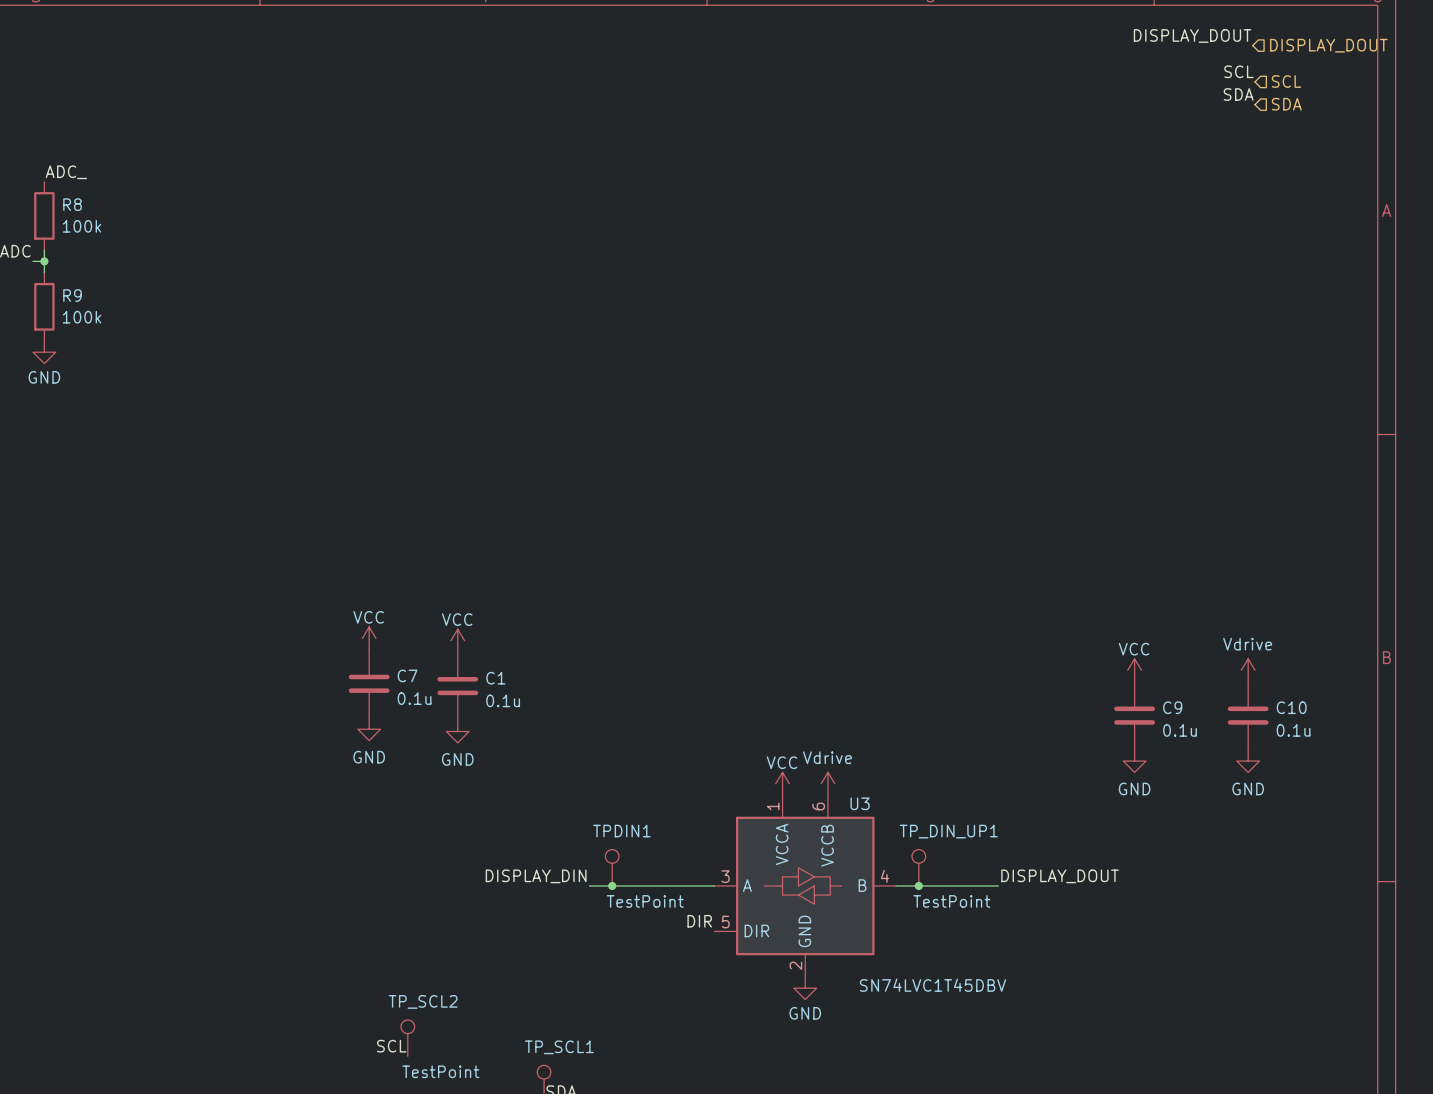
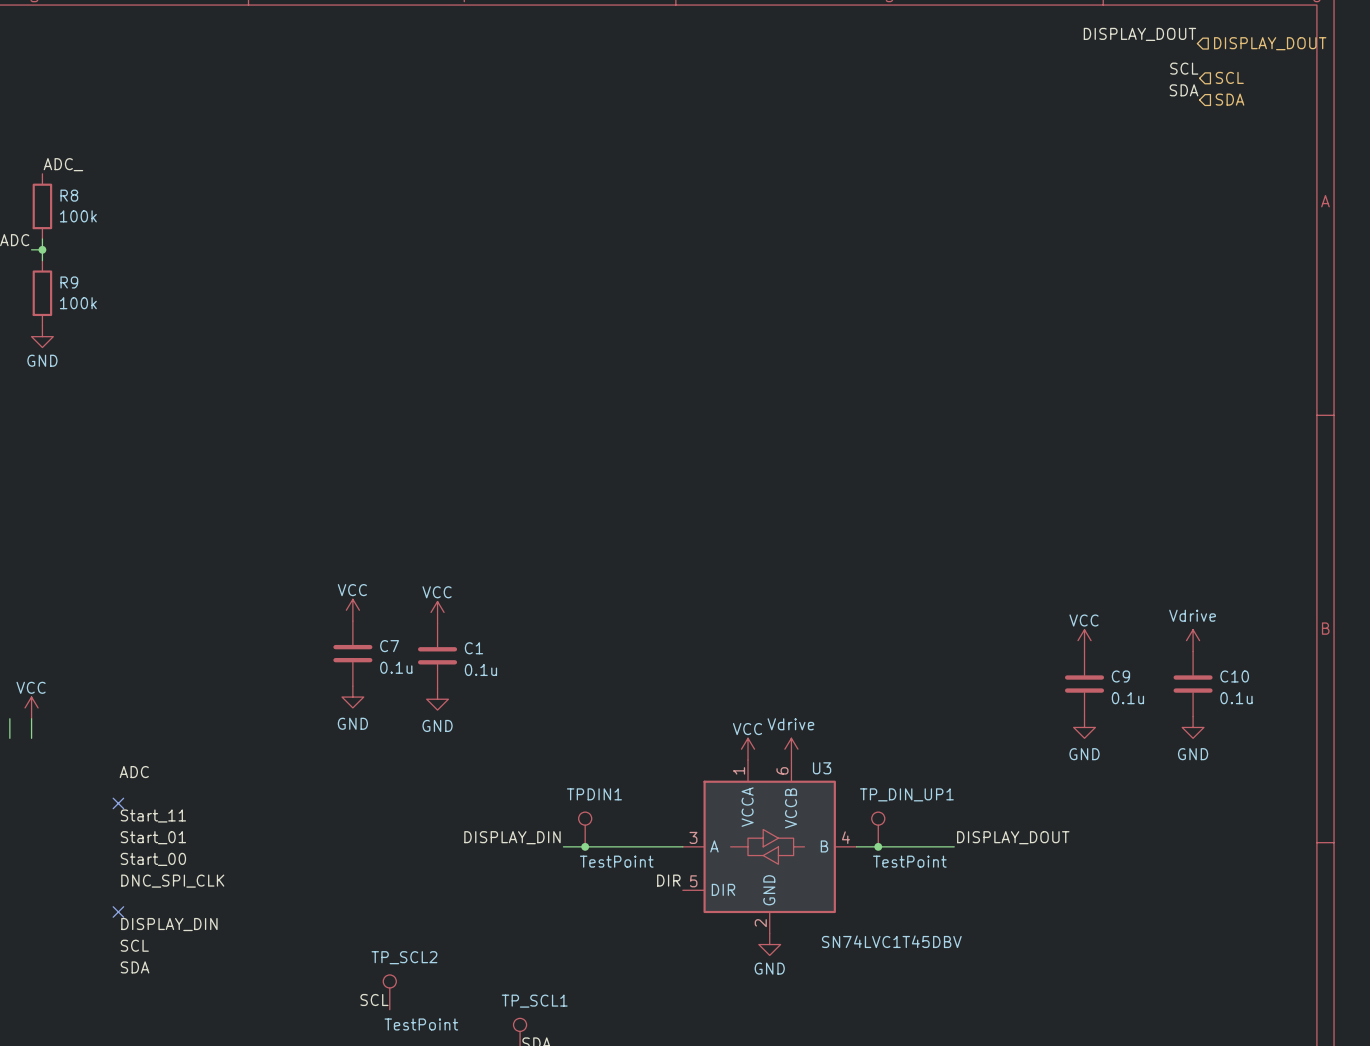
power symbol: none -> VCC (31, 707)
wire: none -> (9, 718) (9, 738)
wire: none -> (31, 718) (31, 738)
label: none -> ADC (134, 772)
no-connect mark: none -> (118, 803)
label: none -> Start_11 (153, 815)
label: none -> Start_01 (153, 837)
label: none -> Start_00 (153, 859)
label: none -> DNC_SPI_CLK (172, 881)
no-connect mark: none -> (118, 911)
label: none -> DISPLAY_DIN (169, 924)
label: none -> SCL (134, 945)
label: none -> SDA (135, 967)

